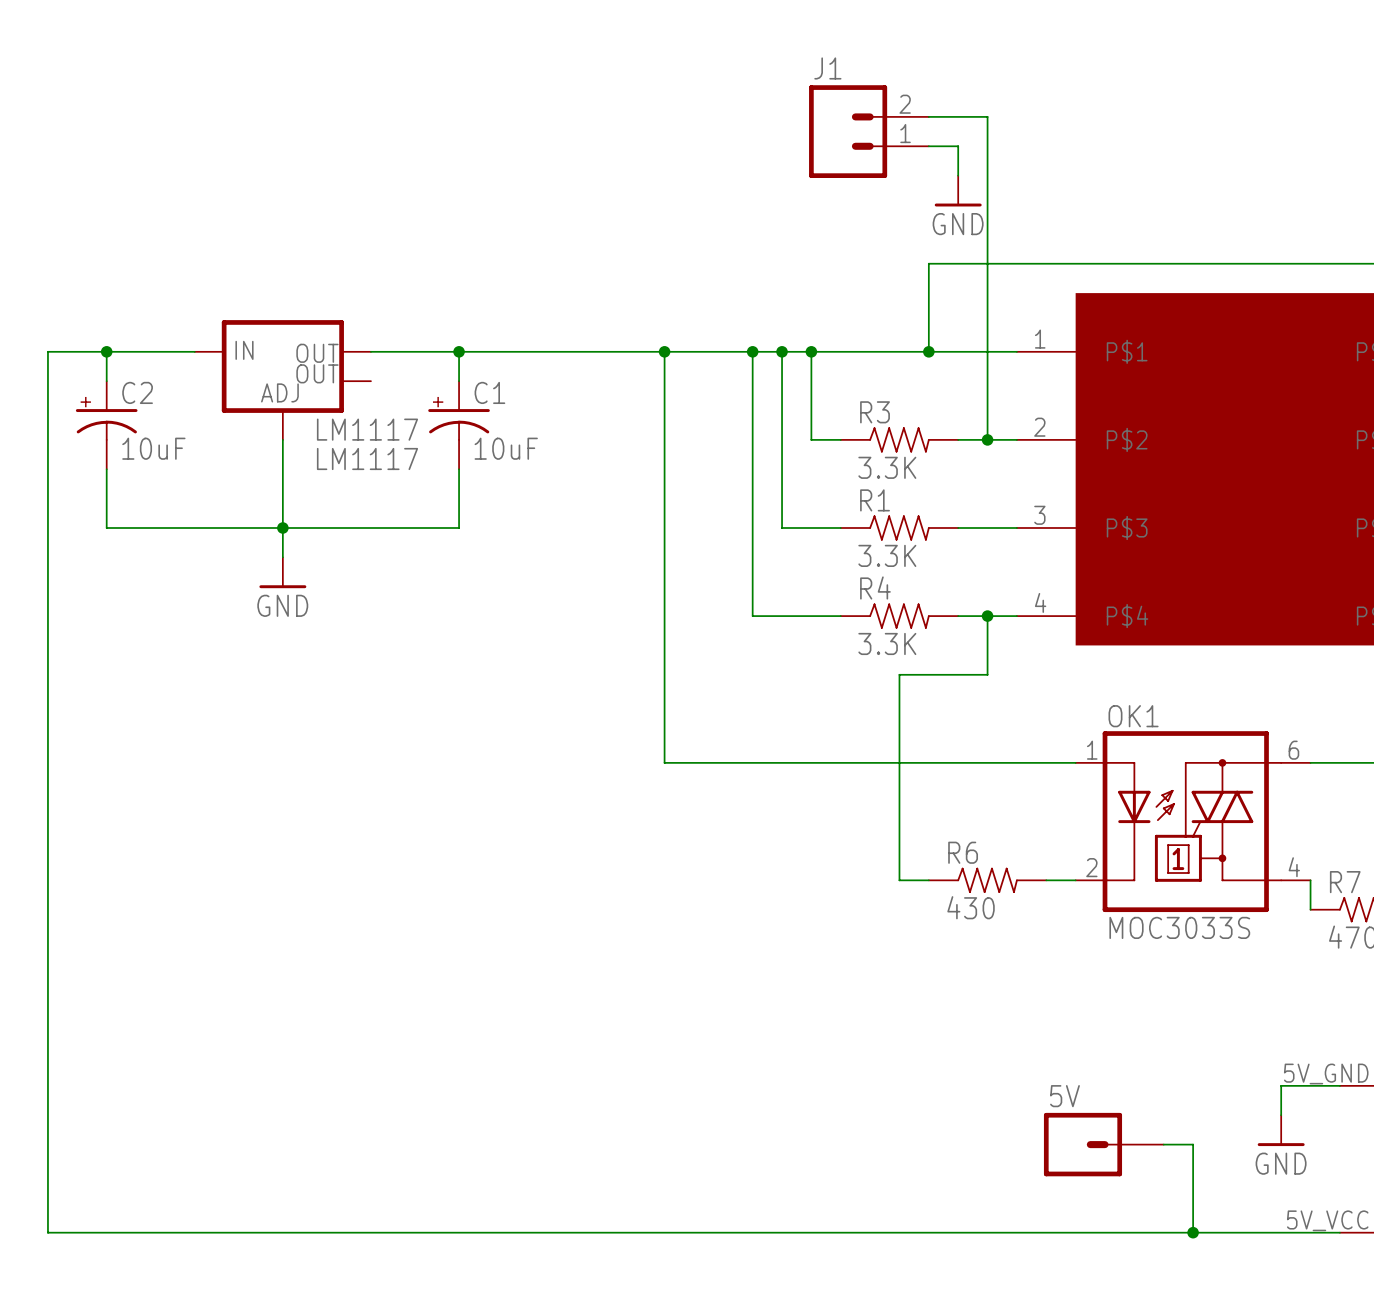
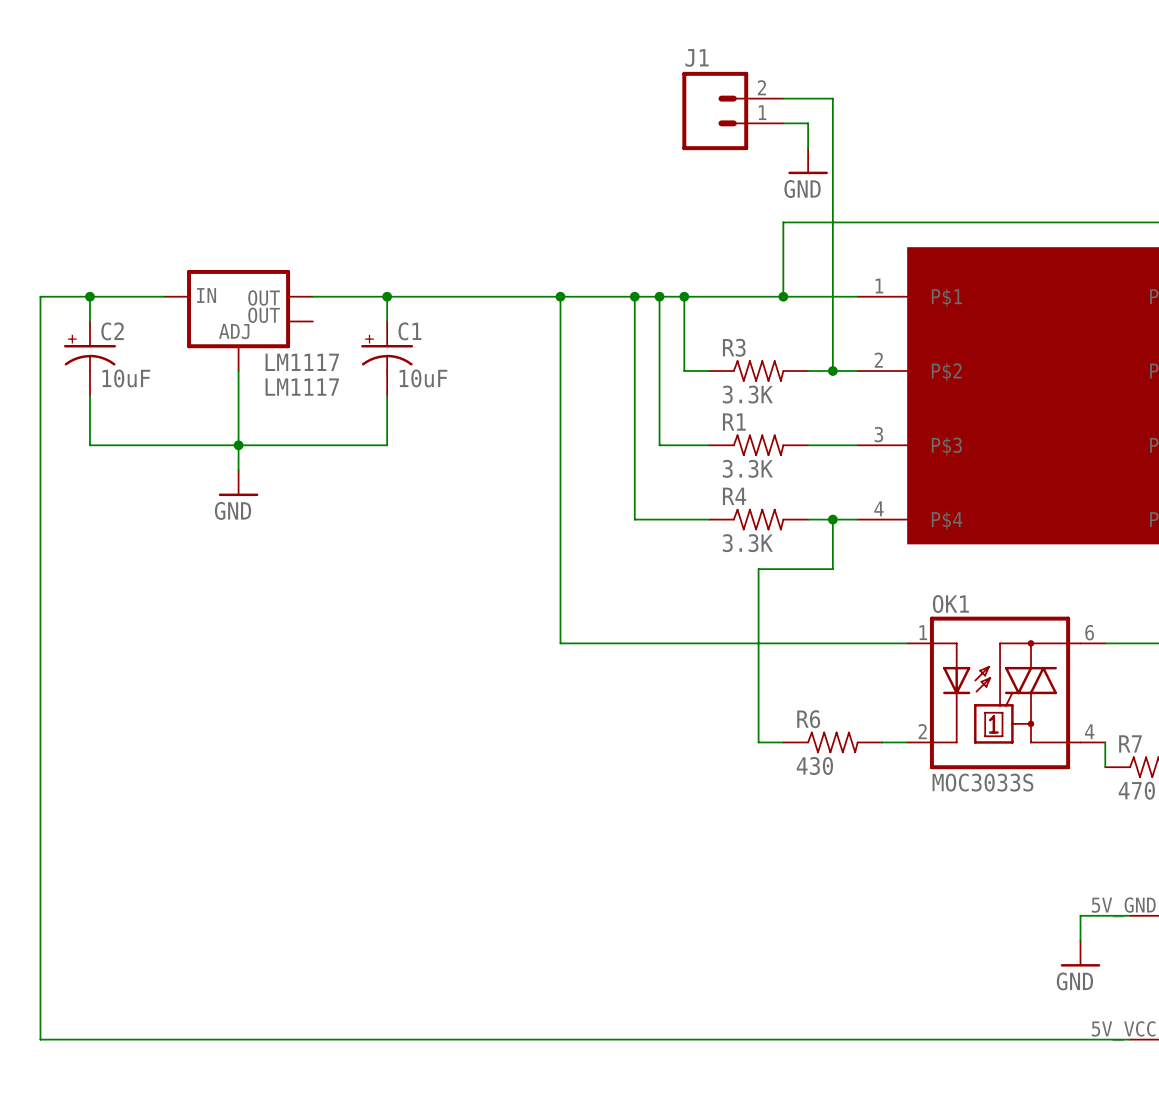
5V: (1103, 1144) -> none
wire: (1163, 1144) (1193, 1144) (1193, 1232) -> none
junction: (1193, 1232) -> none

